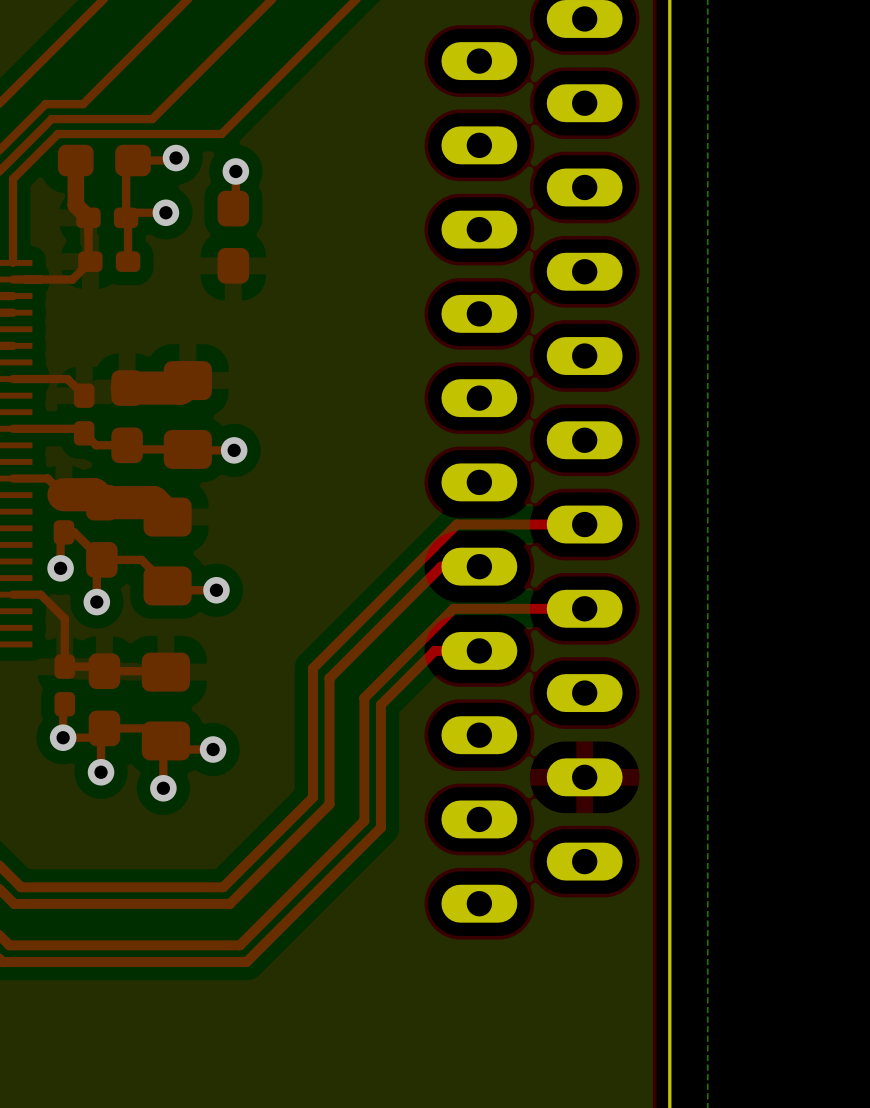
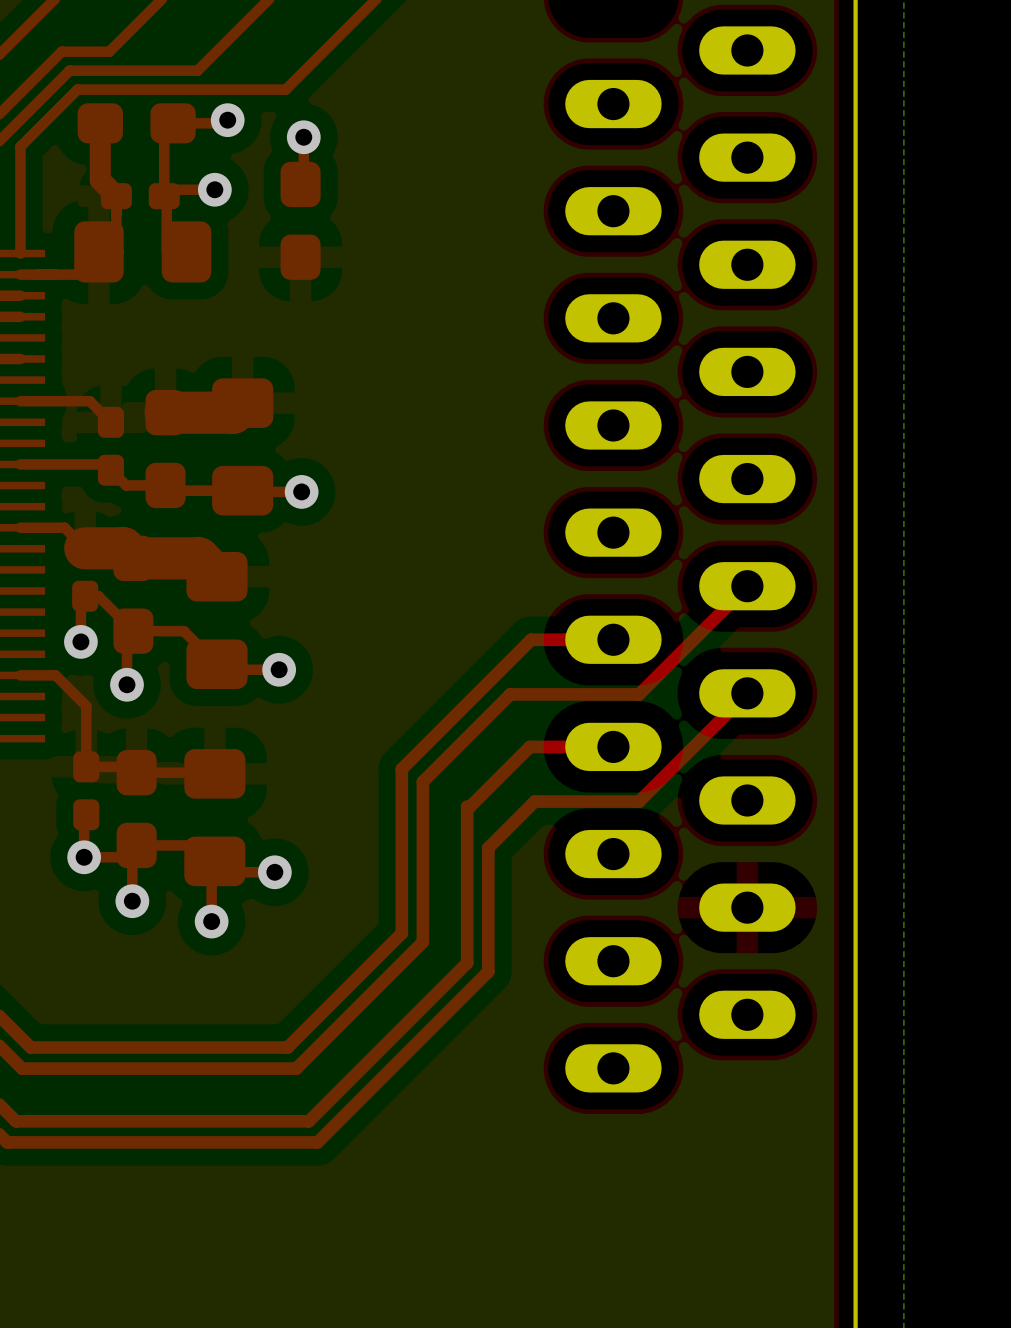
part footprint: [78, 251, 141, 272] -> [74, 221, 212, 283]
top track: (584, 524) (456, 524) (414, 566) -> (747, 586) (639, 694) (510, 694)
top track: (441, 566) (398, 609) -> (564, 639) (531, 639)
top track: (584, 608) (453, 608) (364, 698) -> (747, 693) (639, 801) (534, 801) (488, 847)
top track: (434, 650) (380, 704) (380, 730) -> (556, 746) (529, 746) (470, 806) (467, 806)

